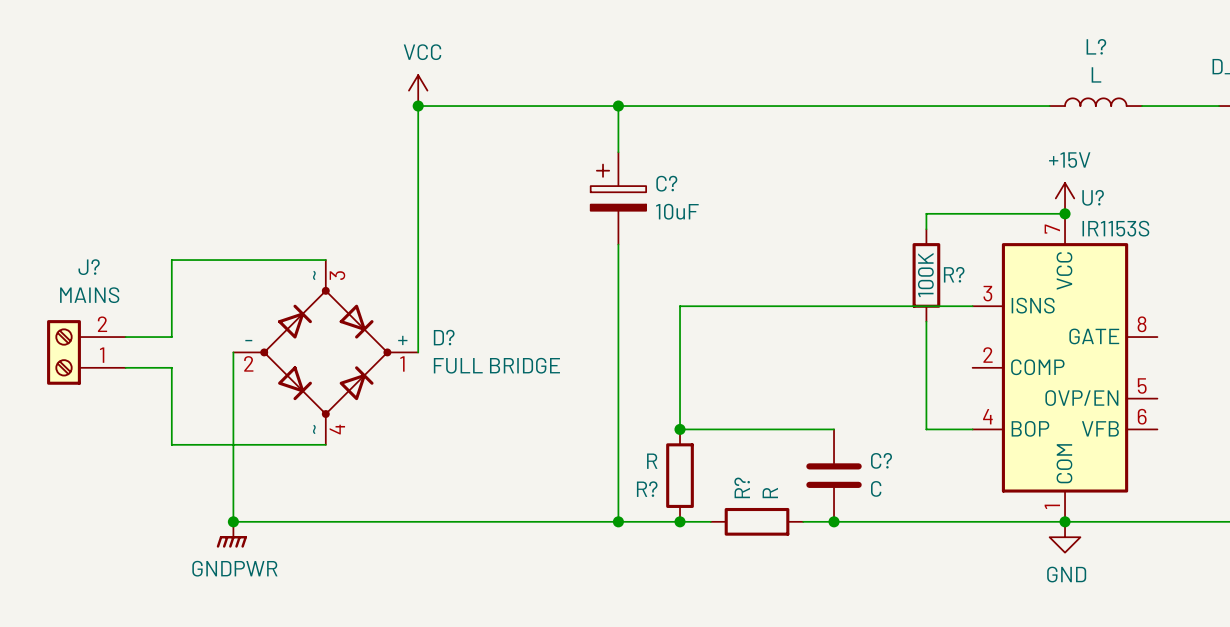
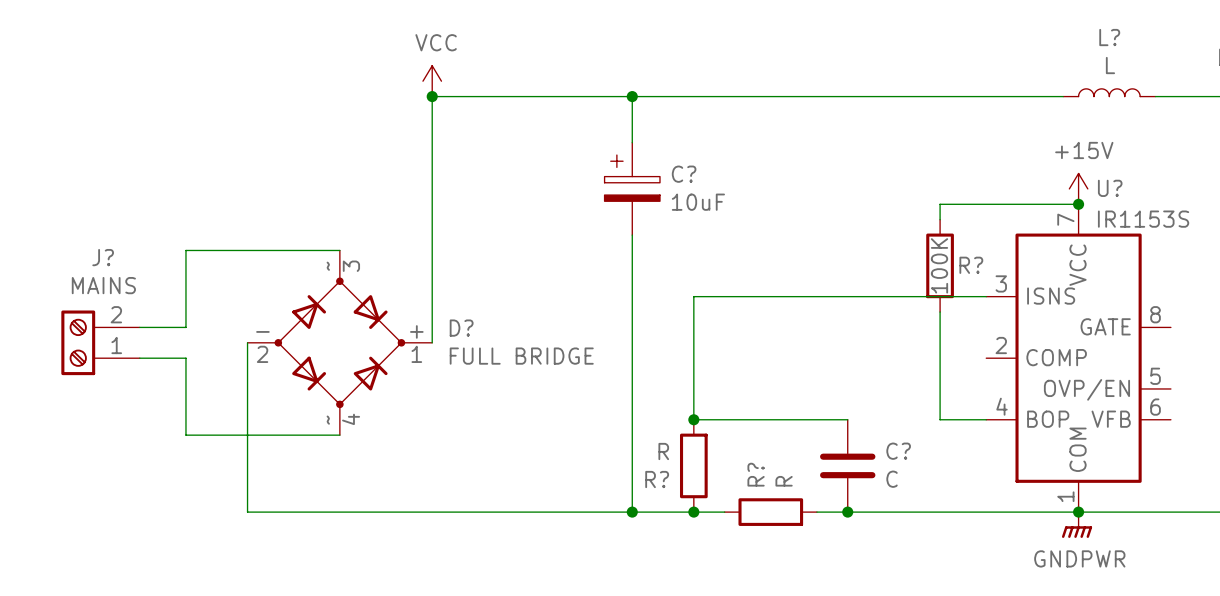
junction: (233, 521) -> none
power symbol: GNDPWR (231, 534) -> none
power symbol: GND (1065, 537) -> GNDPWR (1077, 525)

